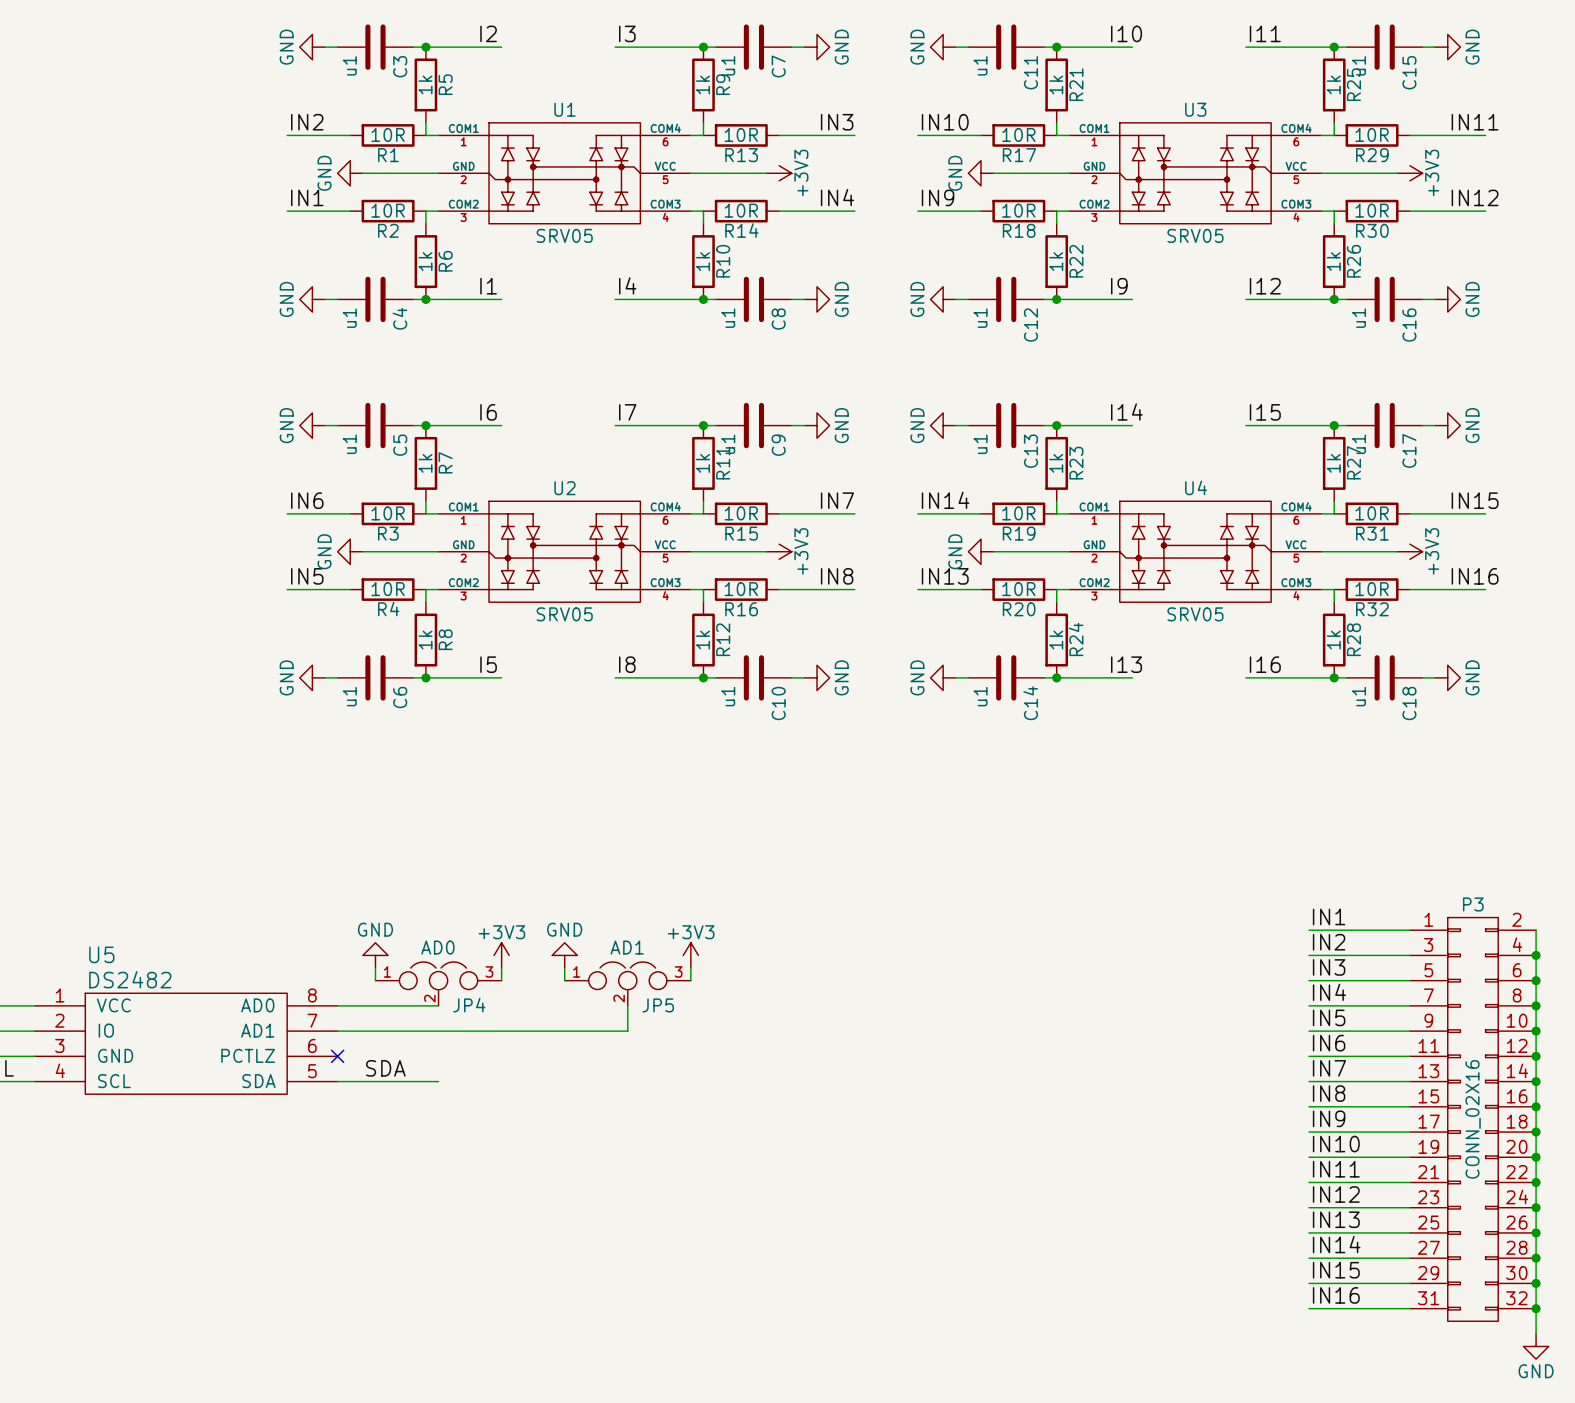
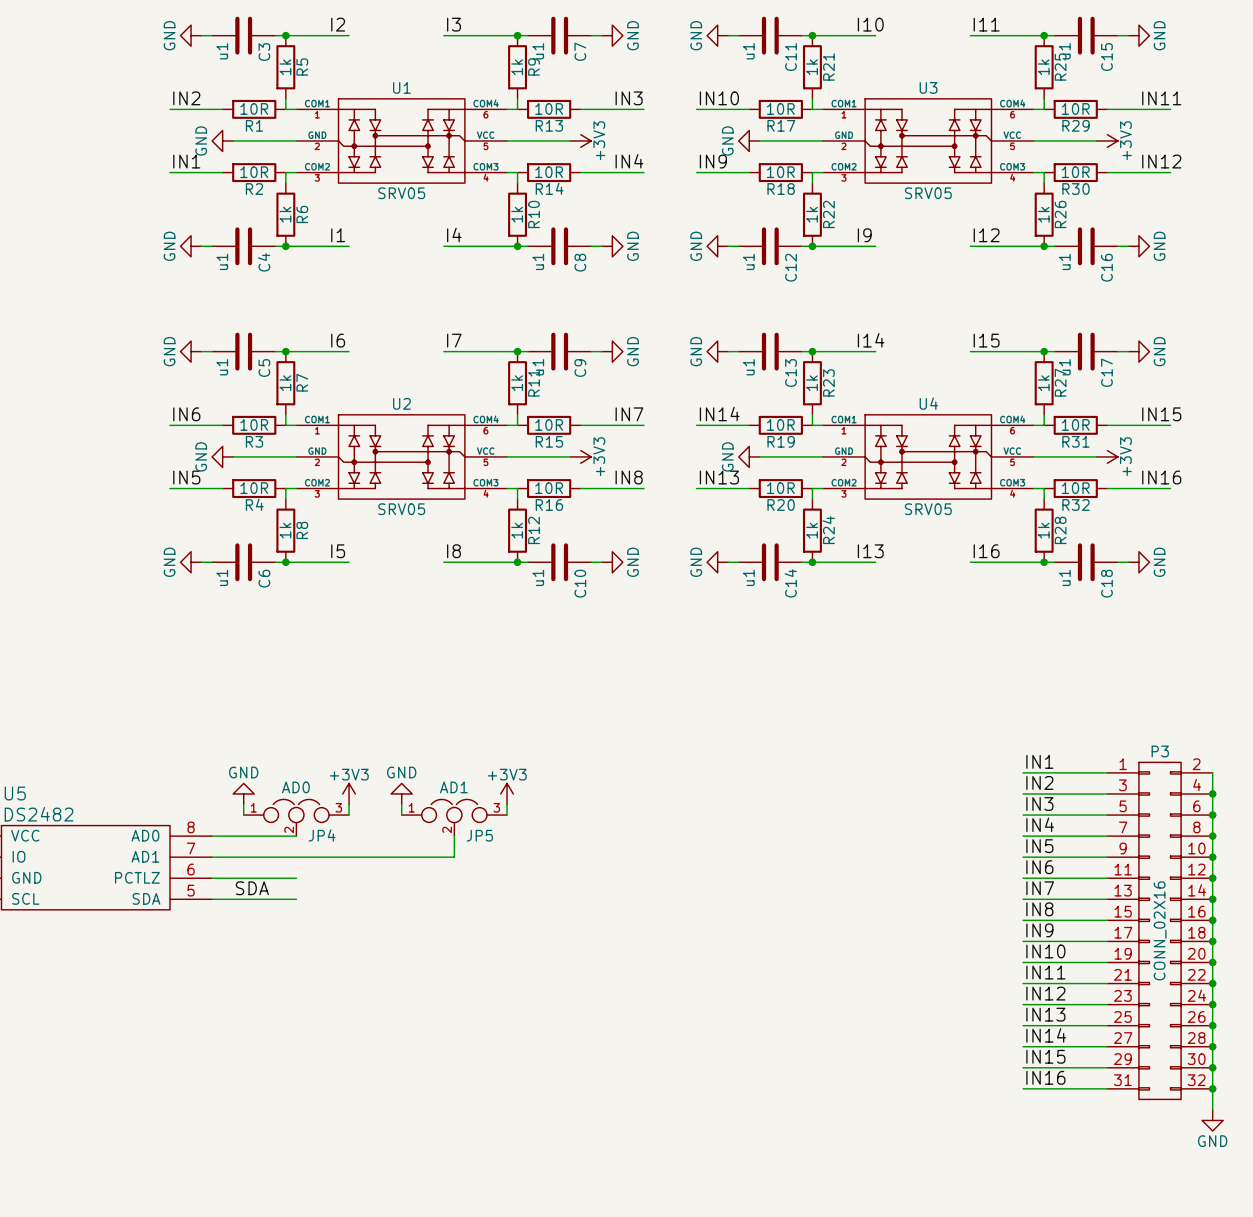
wire: none -> (212, 878) (296, 878)
no-connect mark: (337, 1056) -> none

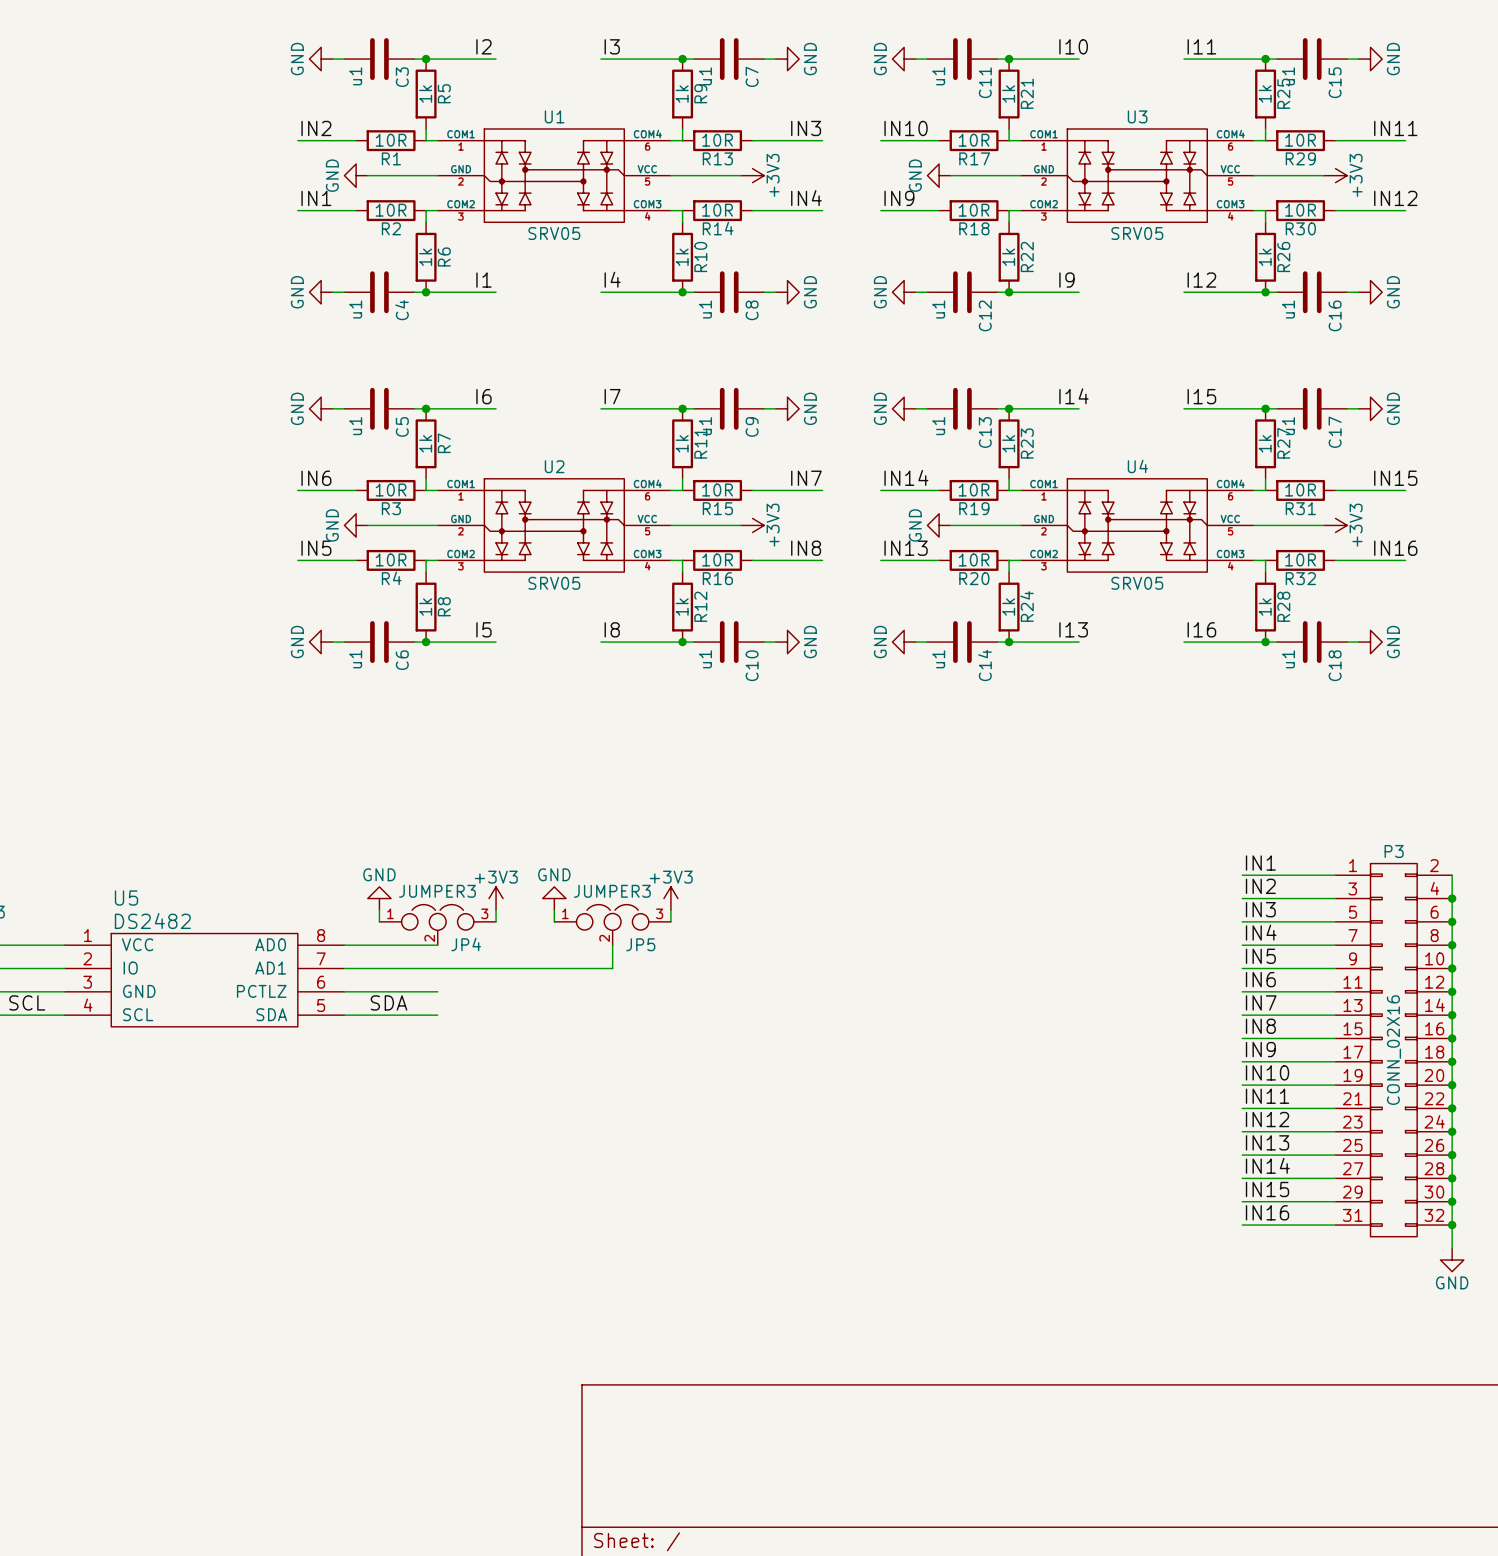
JP4 value: AD0 (295, 787) -> JUMPER3 (437, 891)
JP5 value: AD1 (453, 787) -> JUMPER3 (612, 891)

